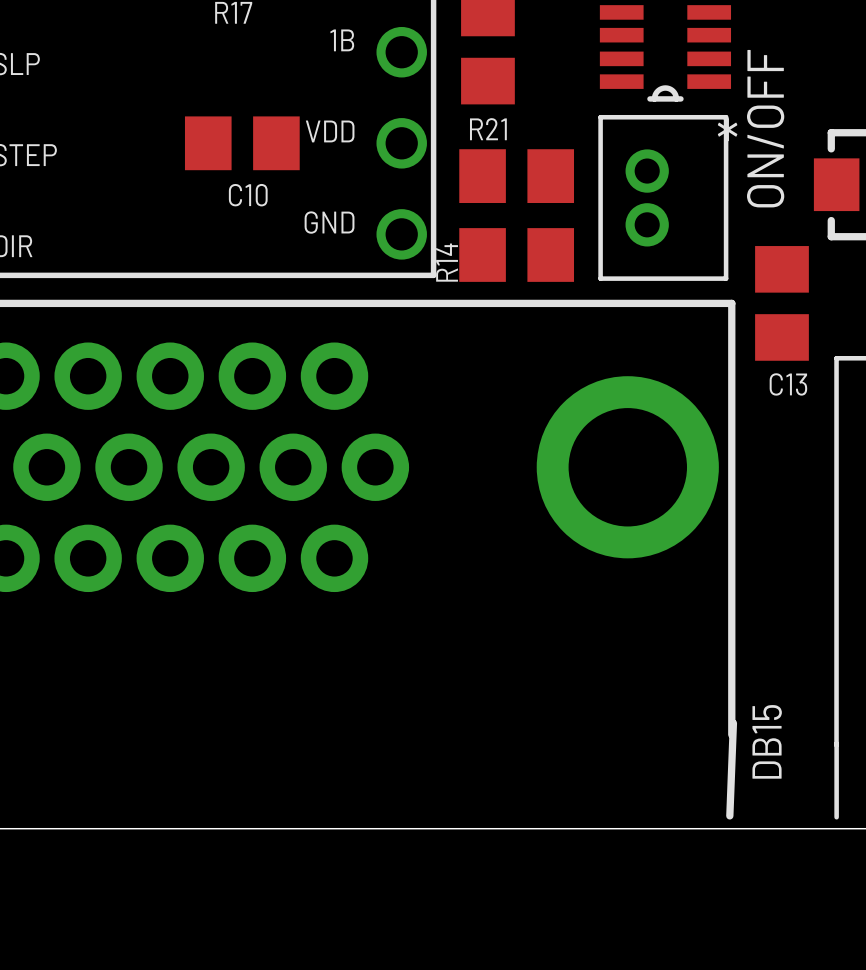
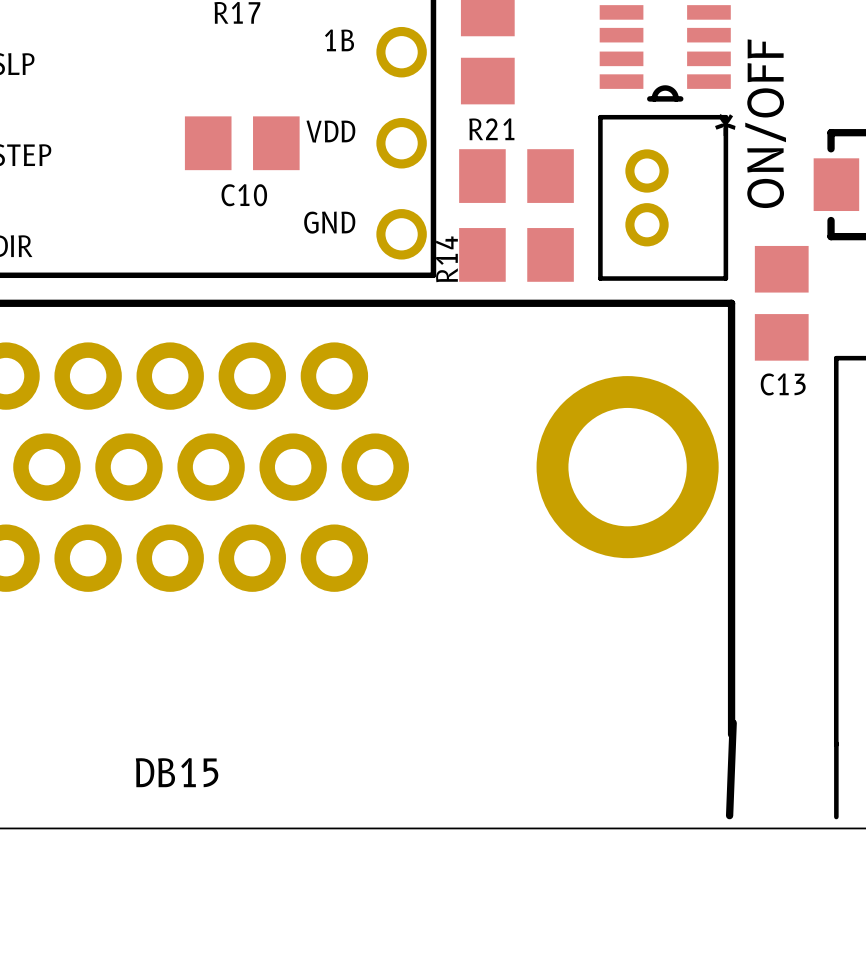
DB15 name rotation: 0° (767, 741) -> 90° clockwise (177, 772)
DB15 name position: DB15 (767, 741) -> DB15 (177, 772)

